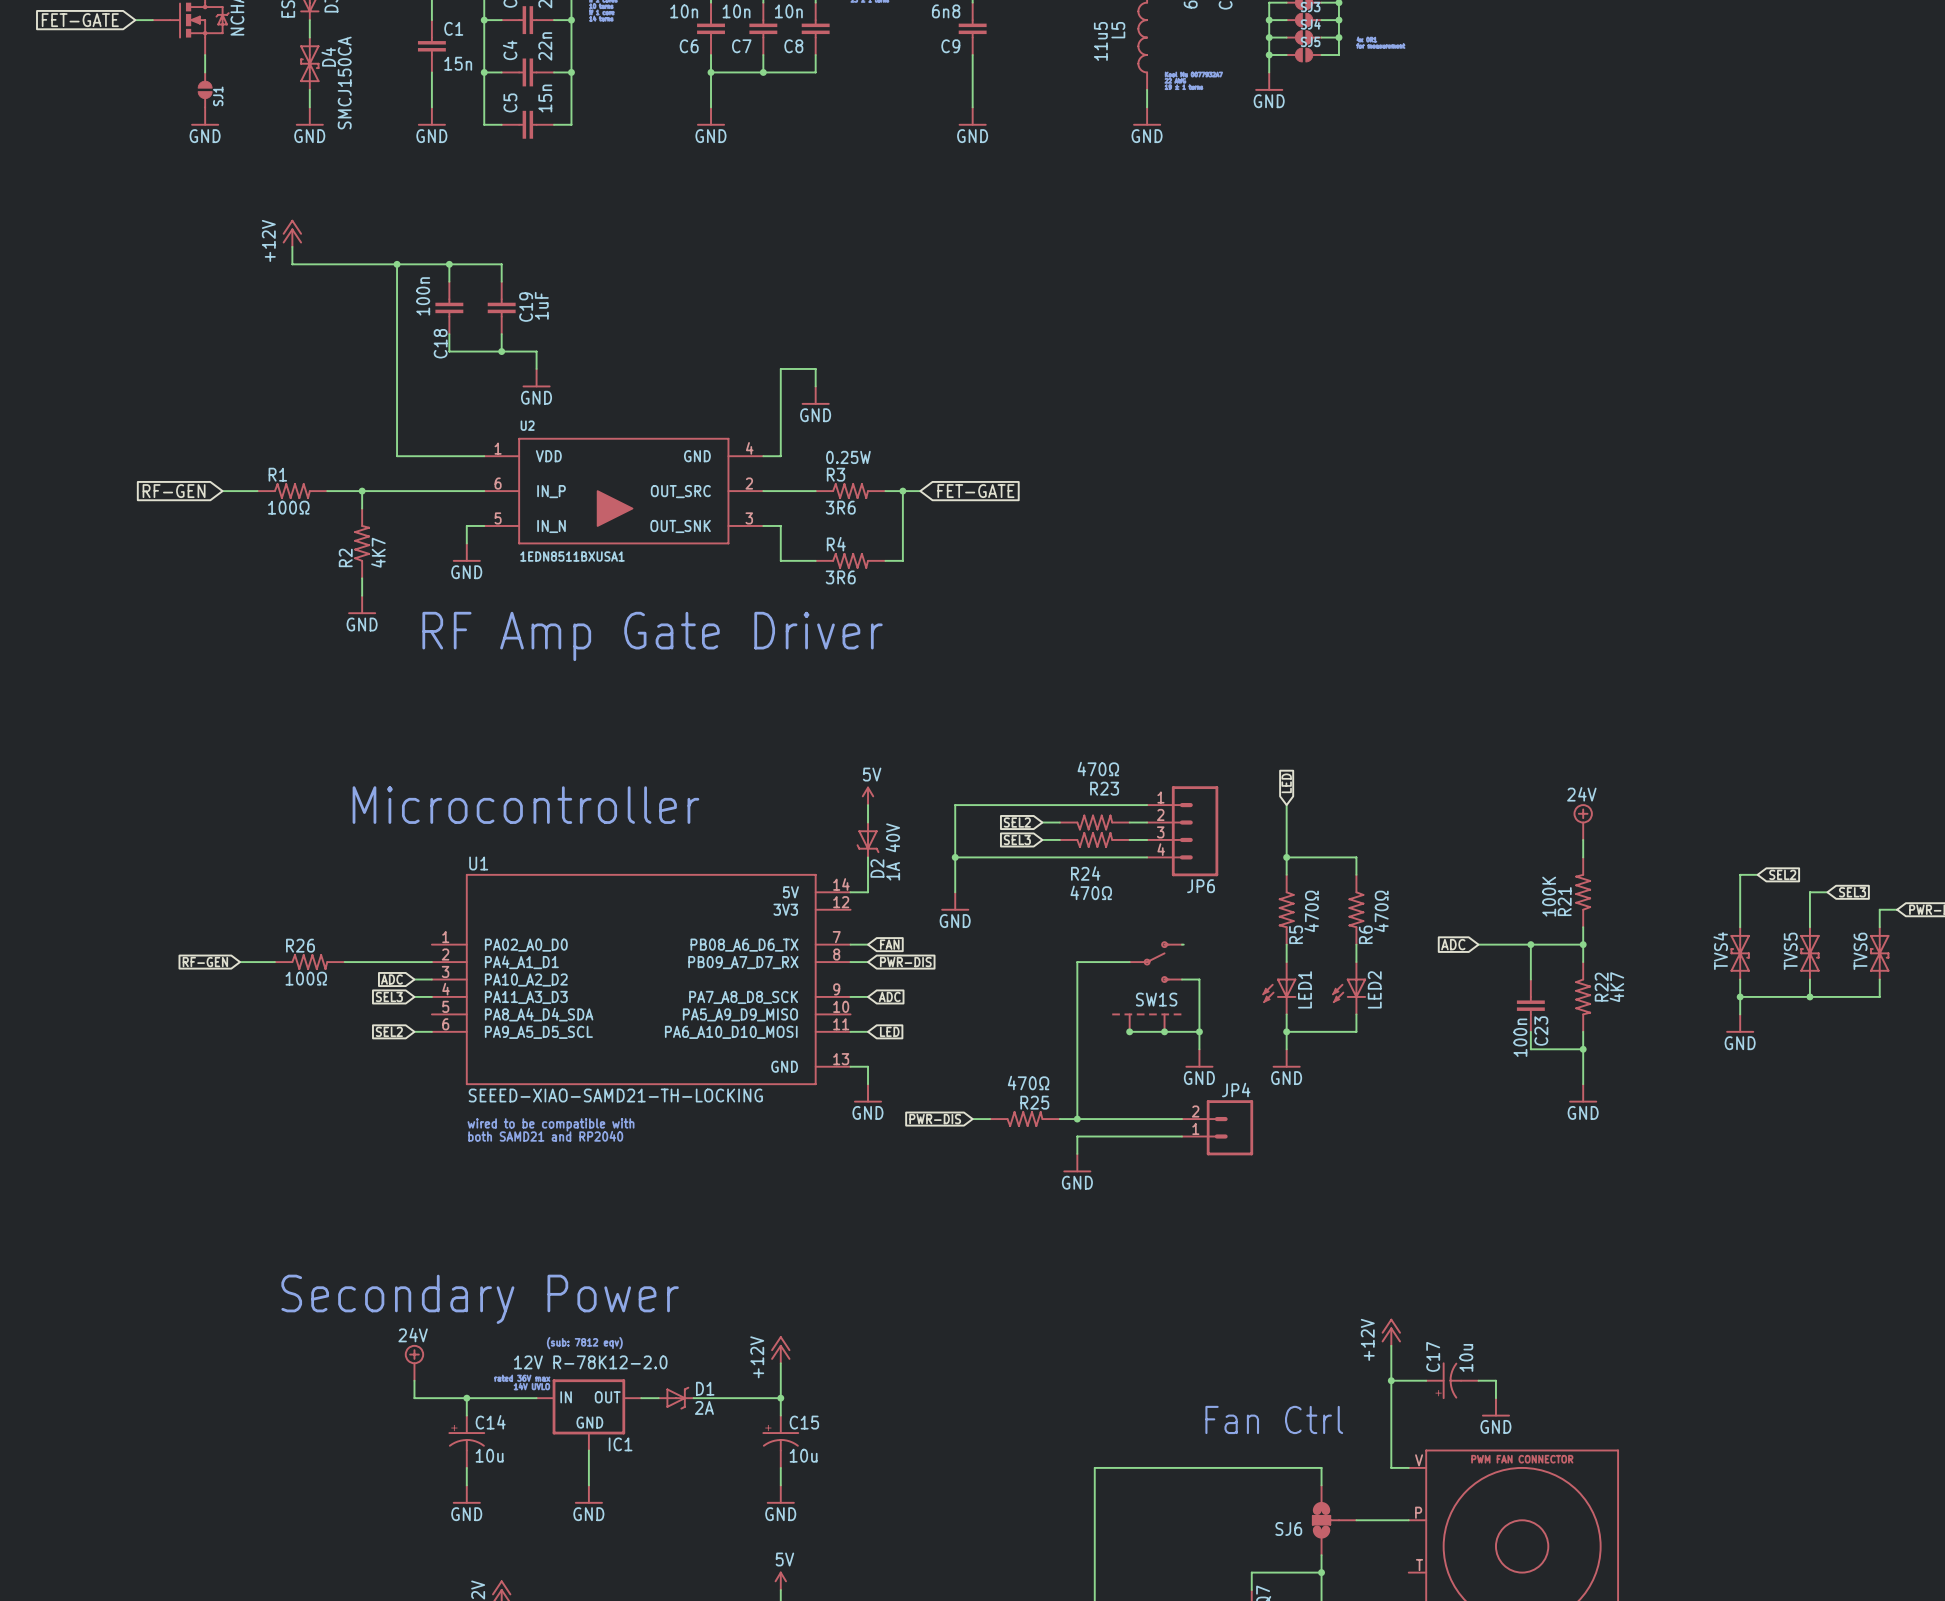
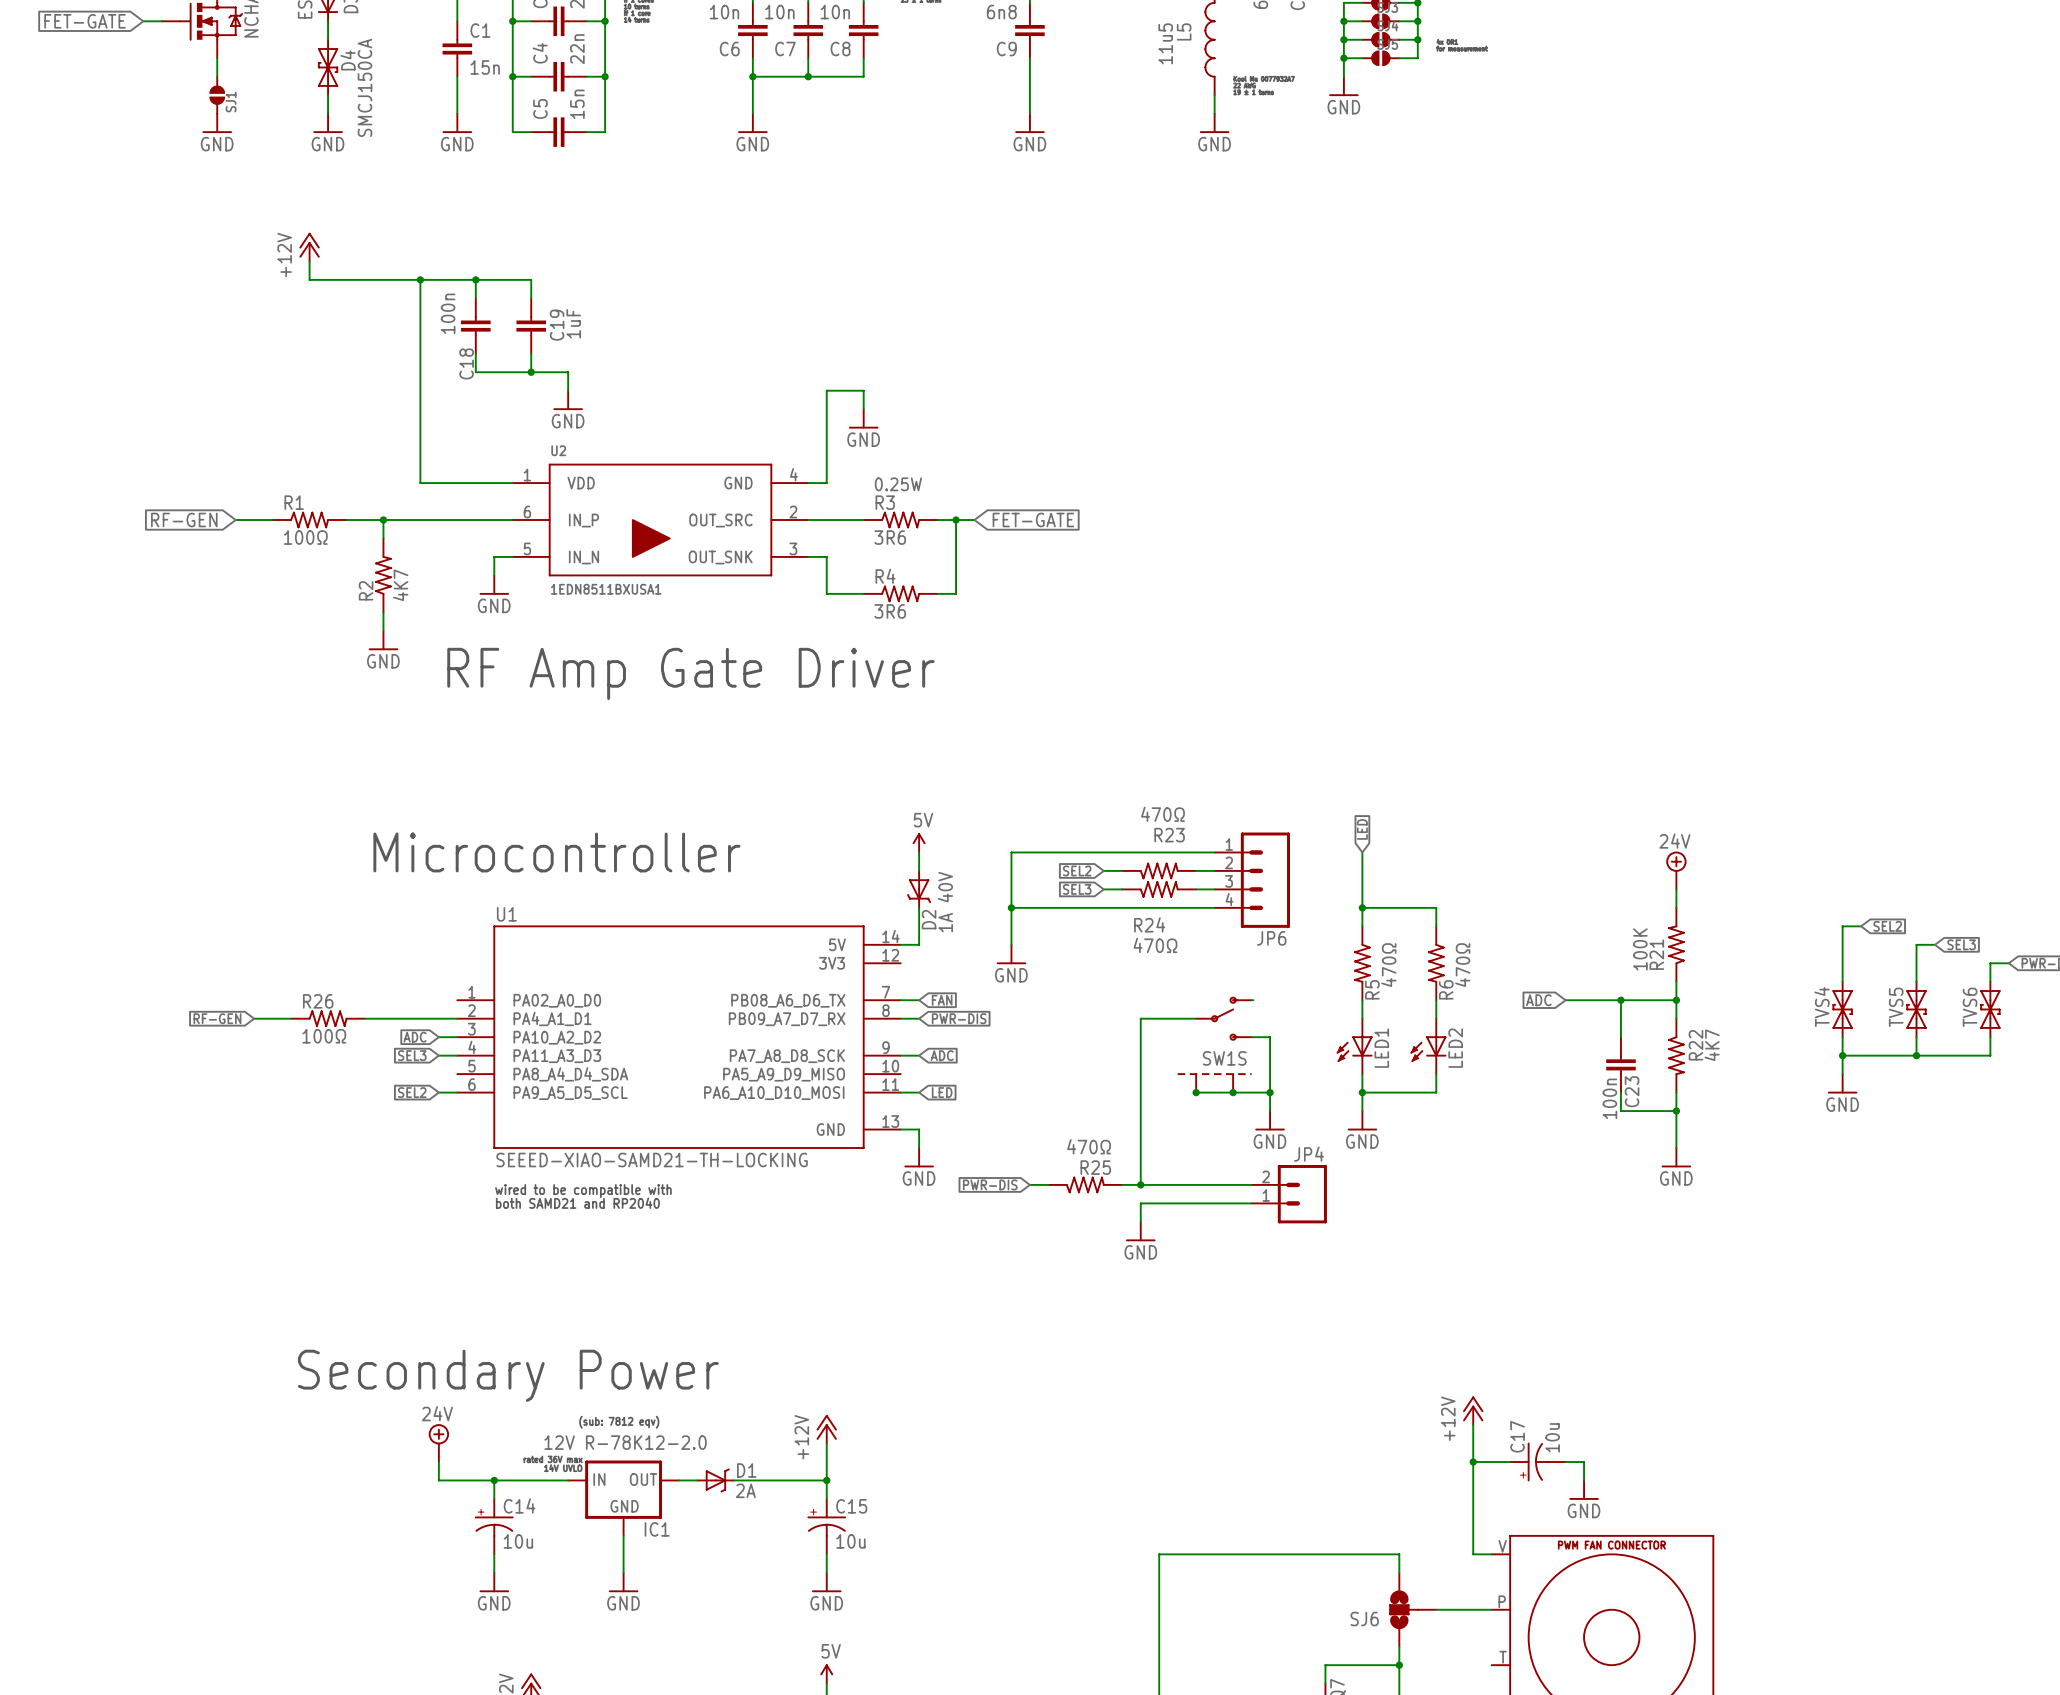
text: Fan Ctrl (1274, 1419) -> none

